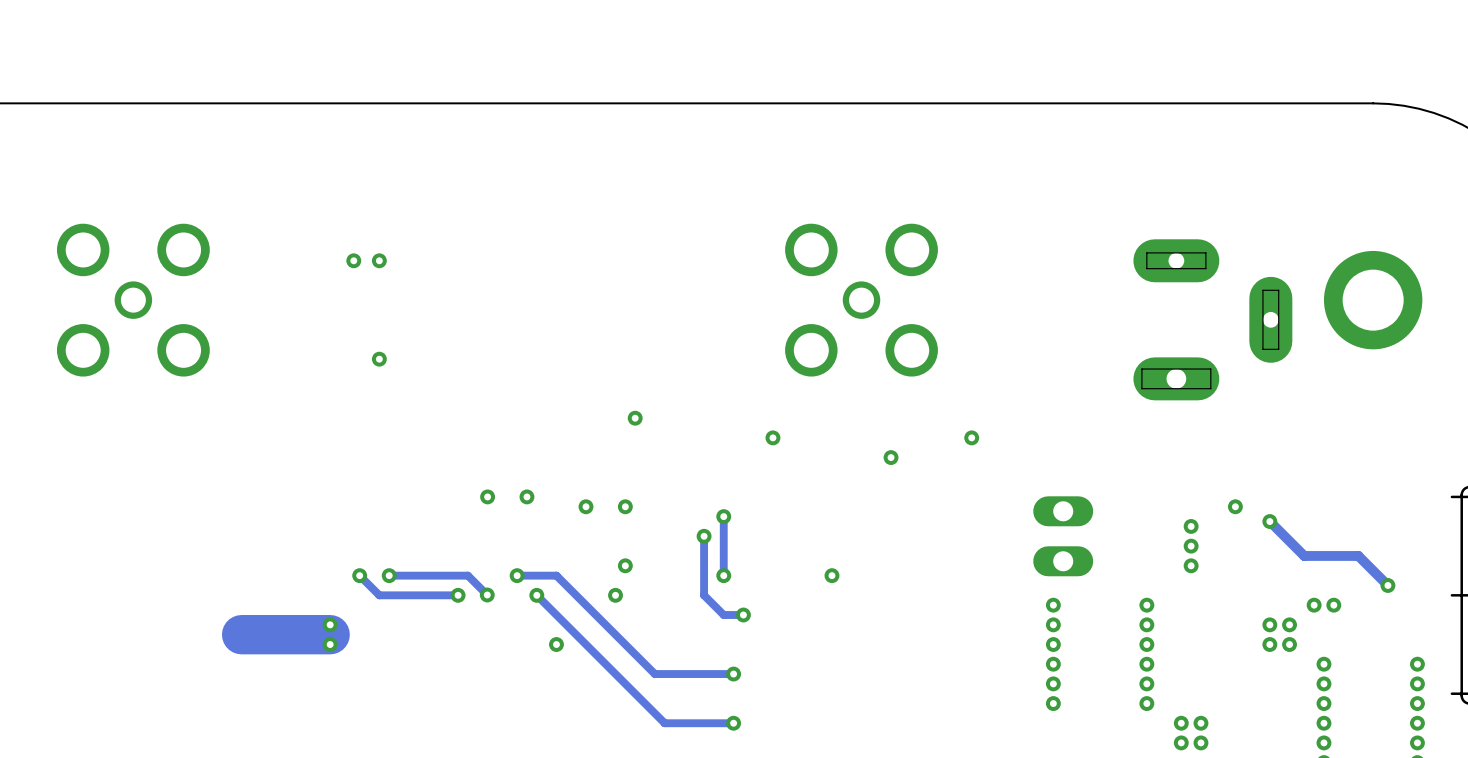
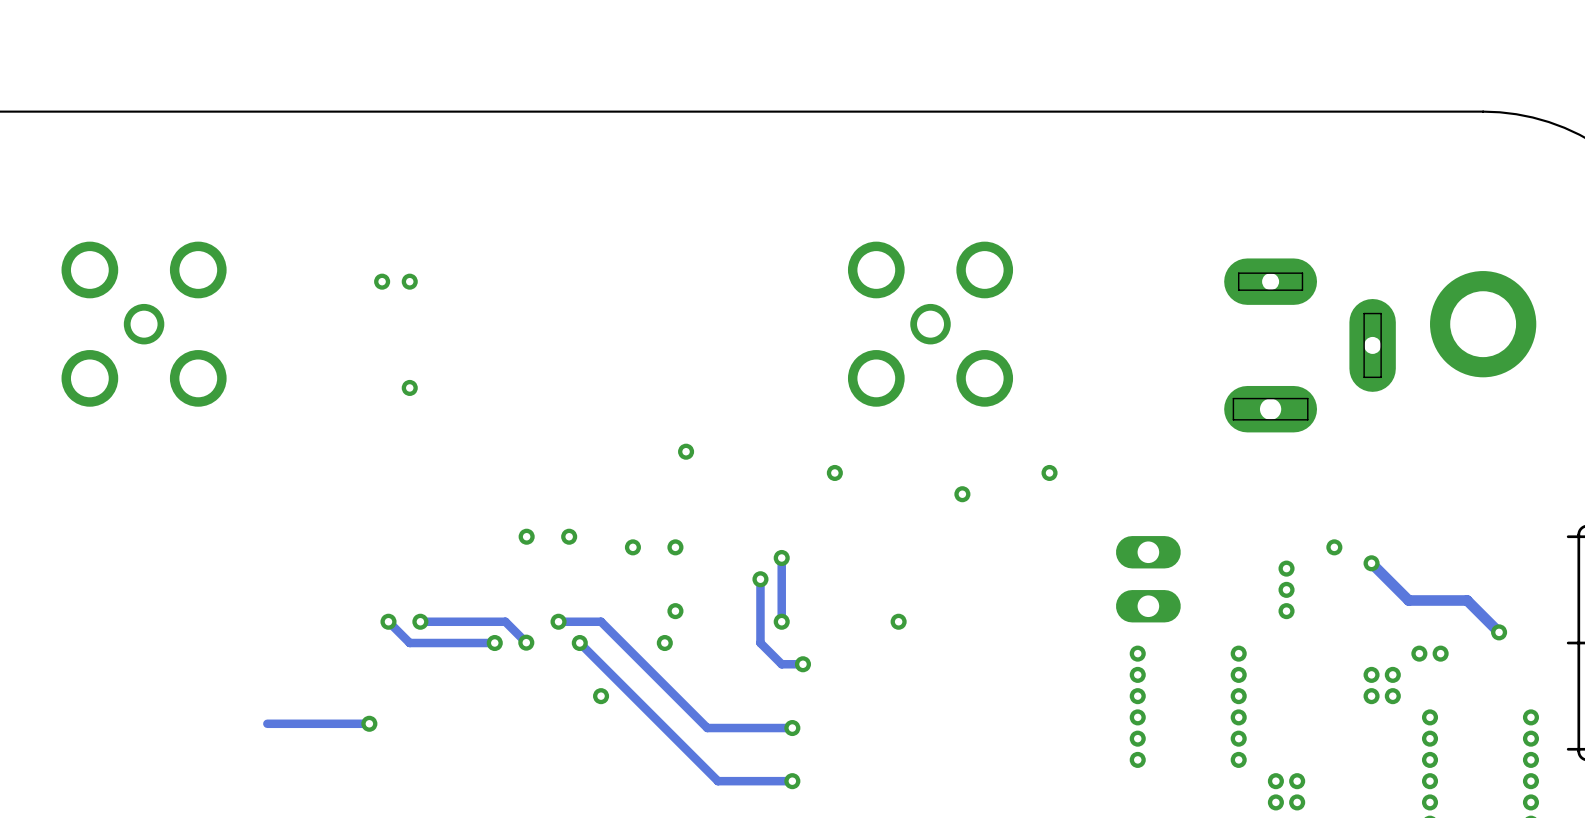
via: (330, 624) -> none
track: (330, 634) (241, 634) -> none
via: (330, 644) -> none
track: none -> (369, 723) (267, 723)
via: none -> (369, 723)

